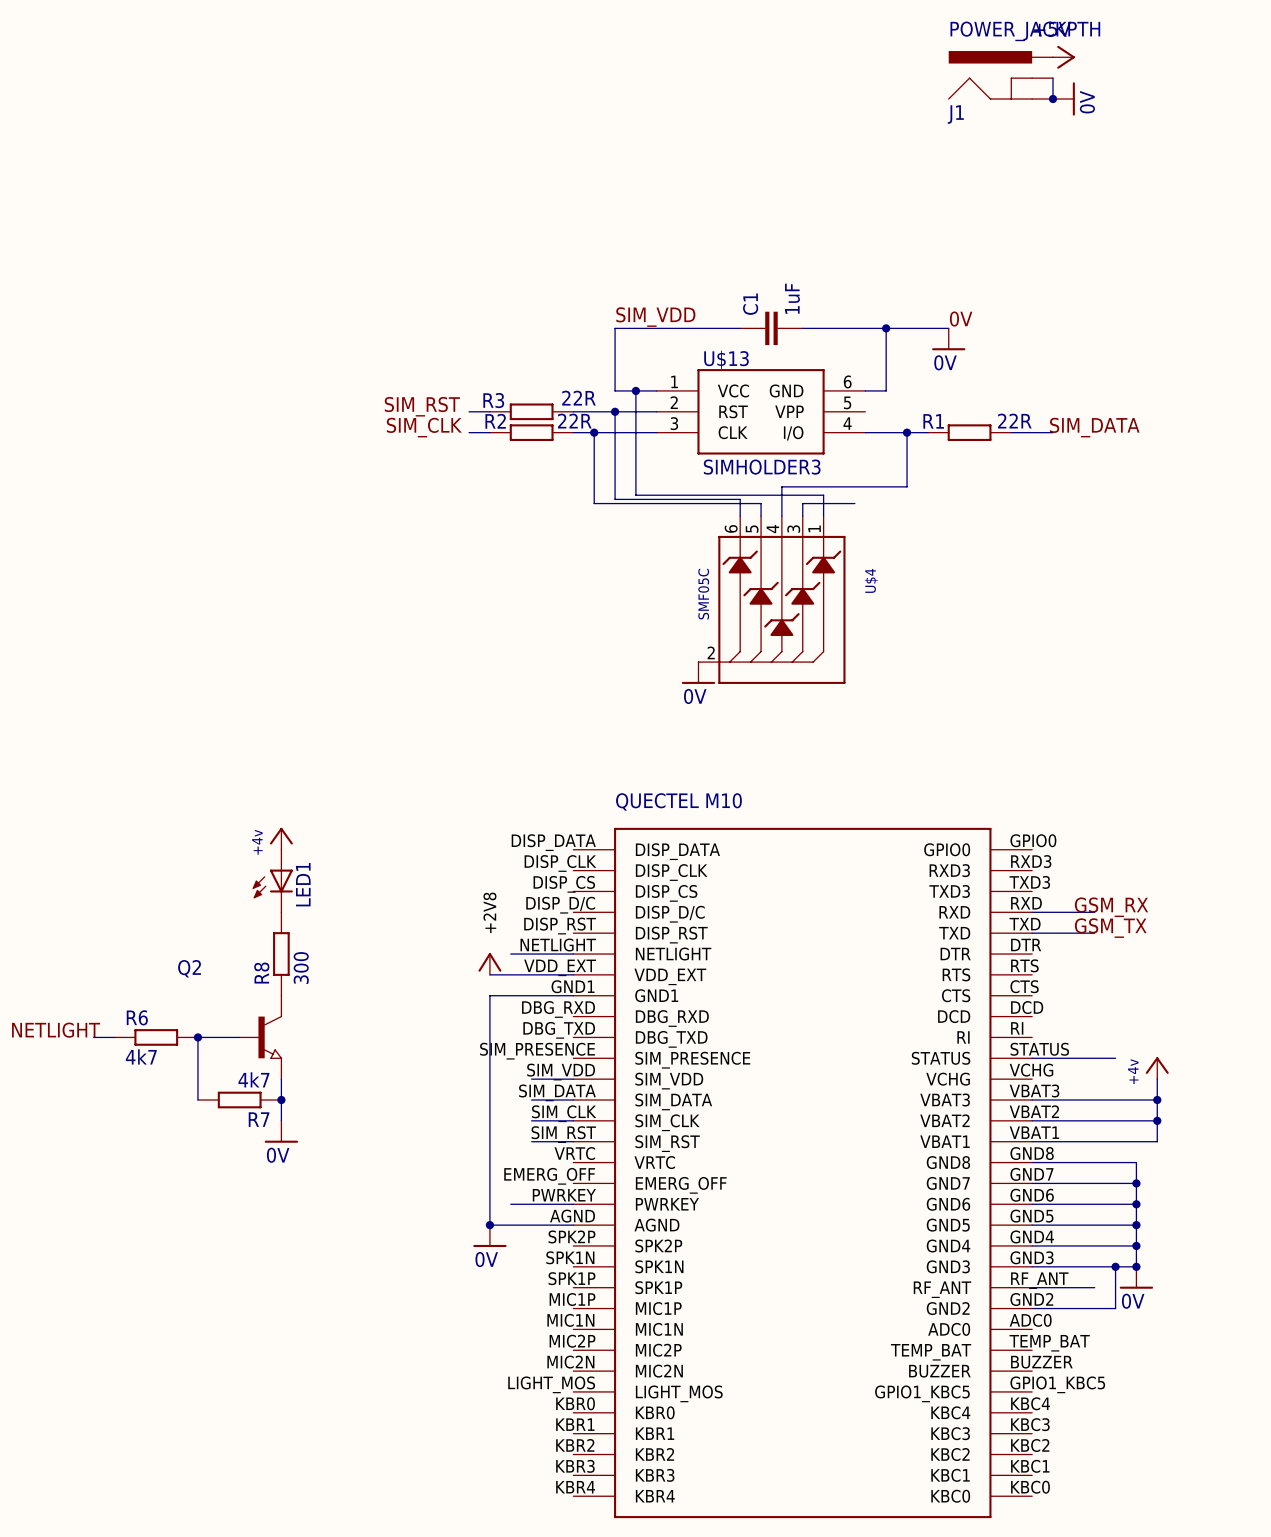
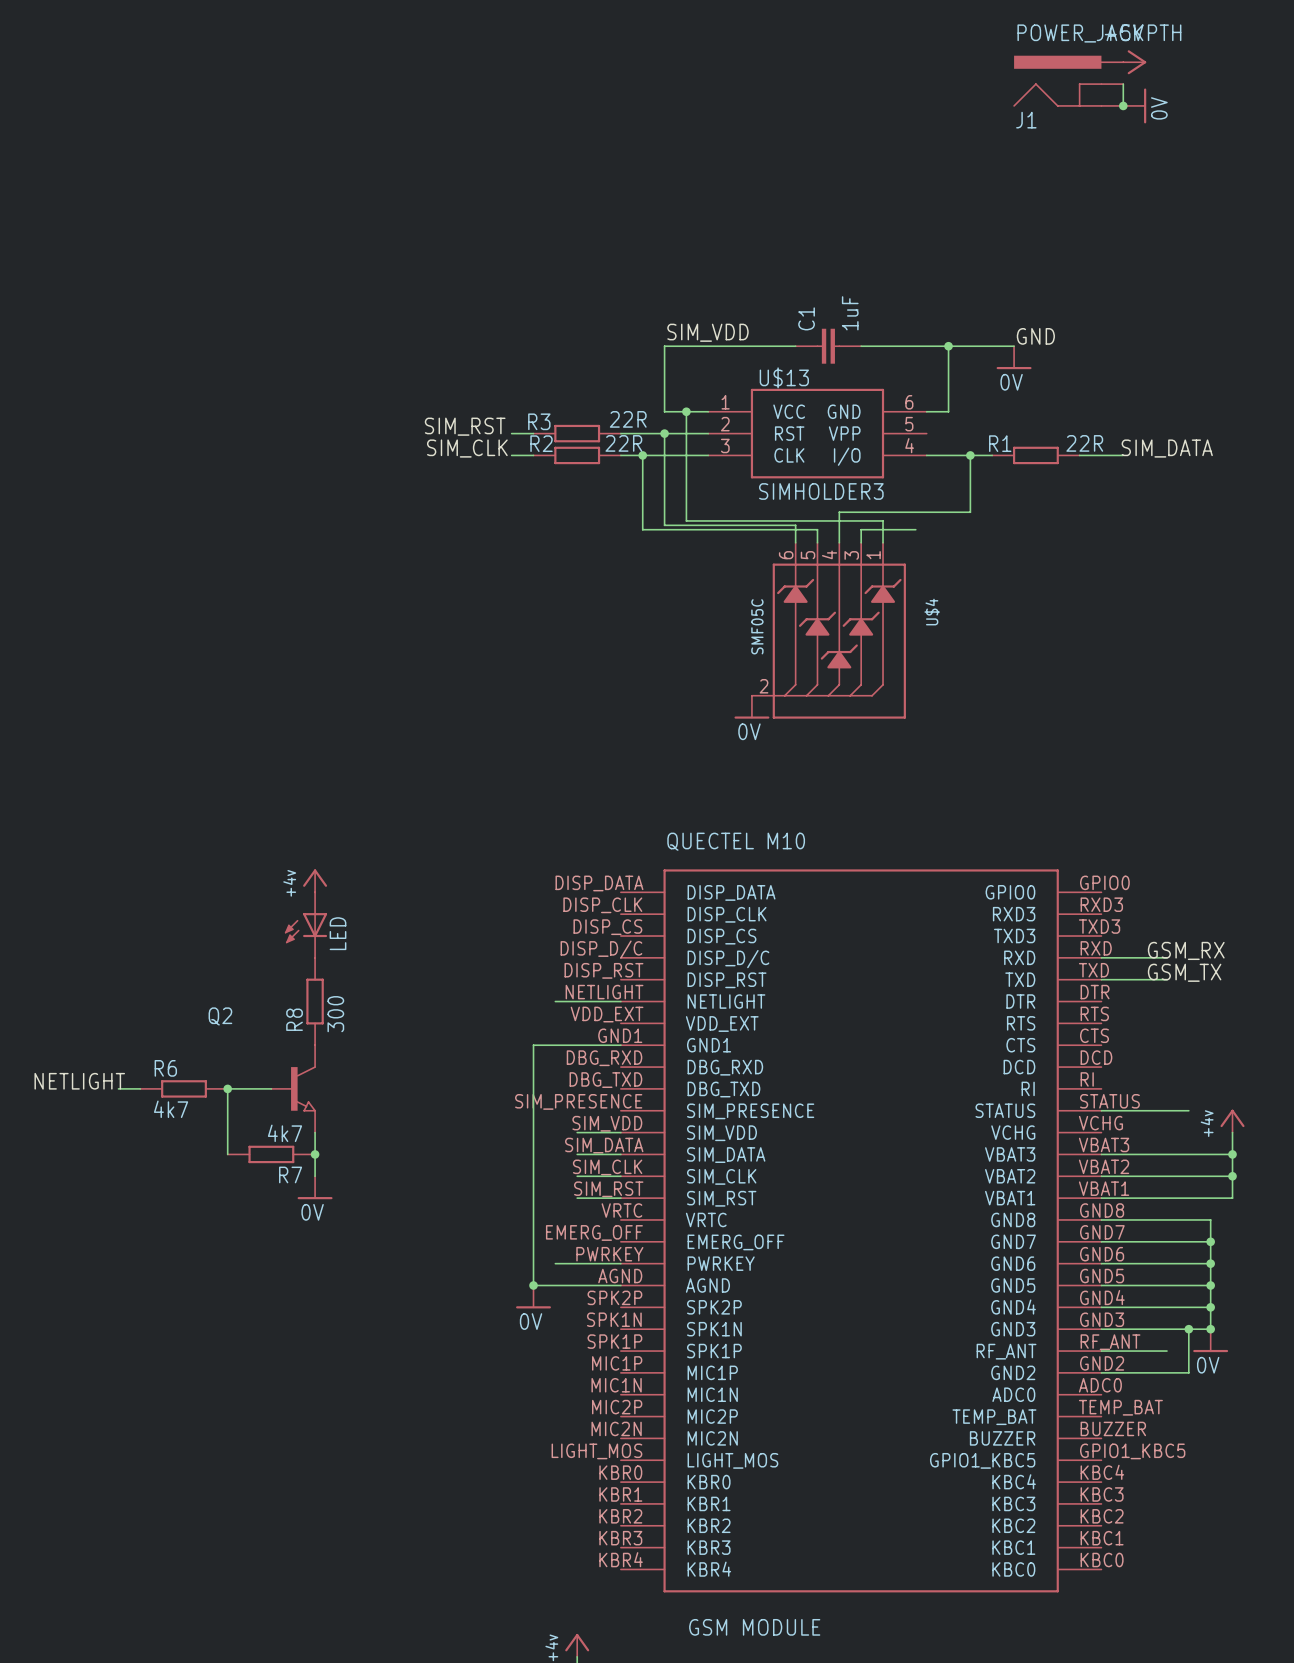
label: 0V (961, 319) -> GND (1035, 336)
LED1 name: LED1 (303, 884) -> LED (338, 933)
power symbol: (489, 963) -> none
wire: (489, 974) (573, 974) -> none

